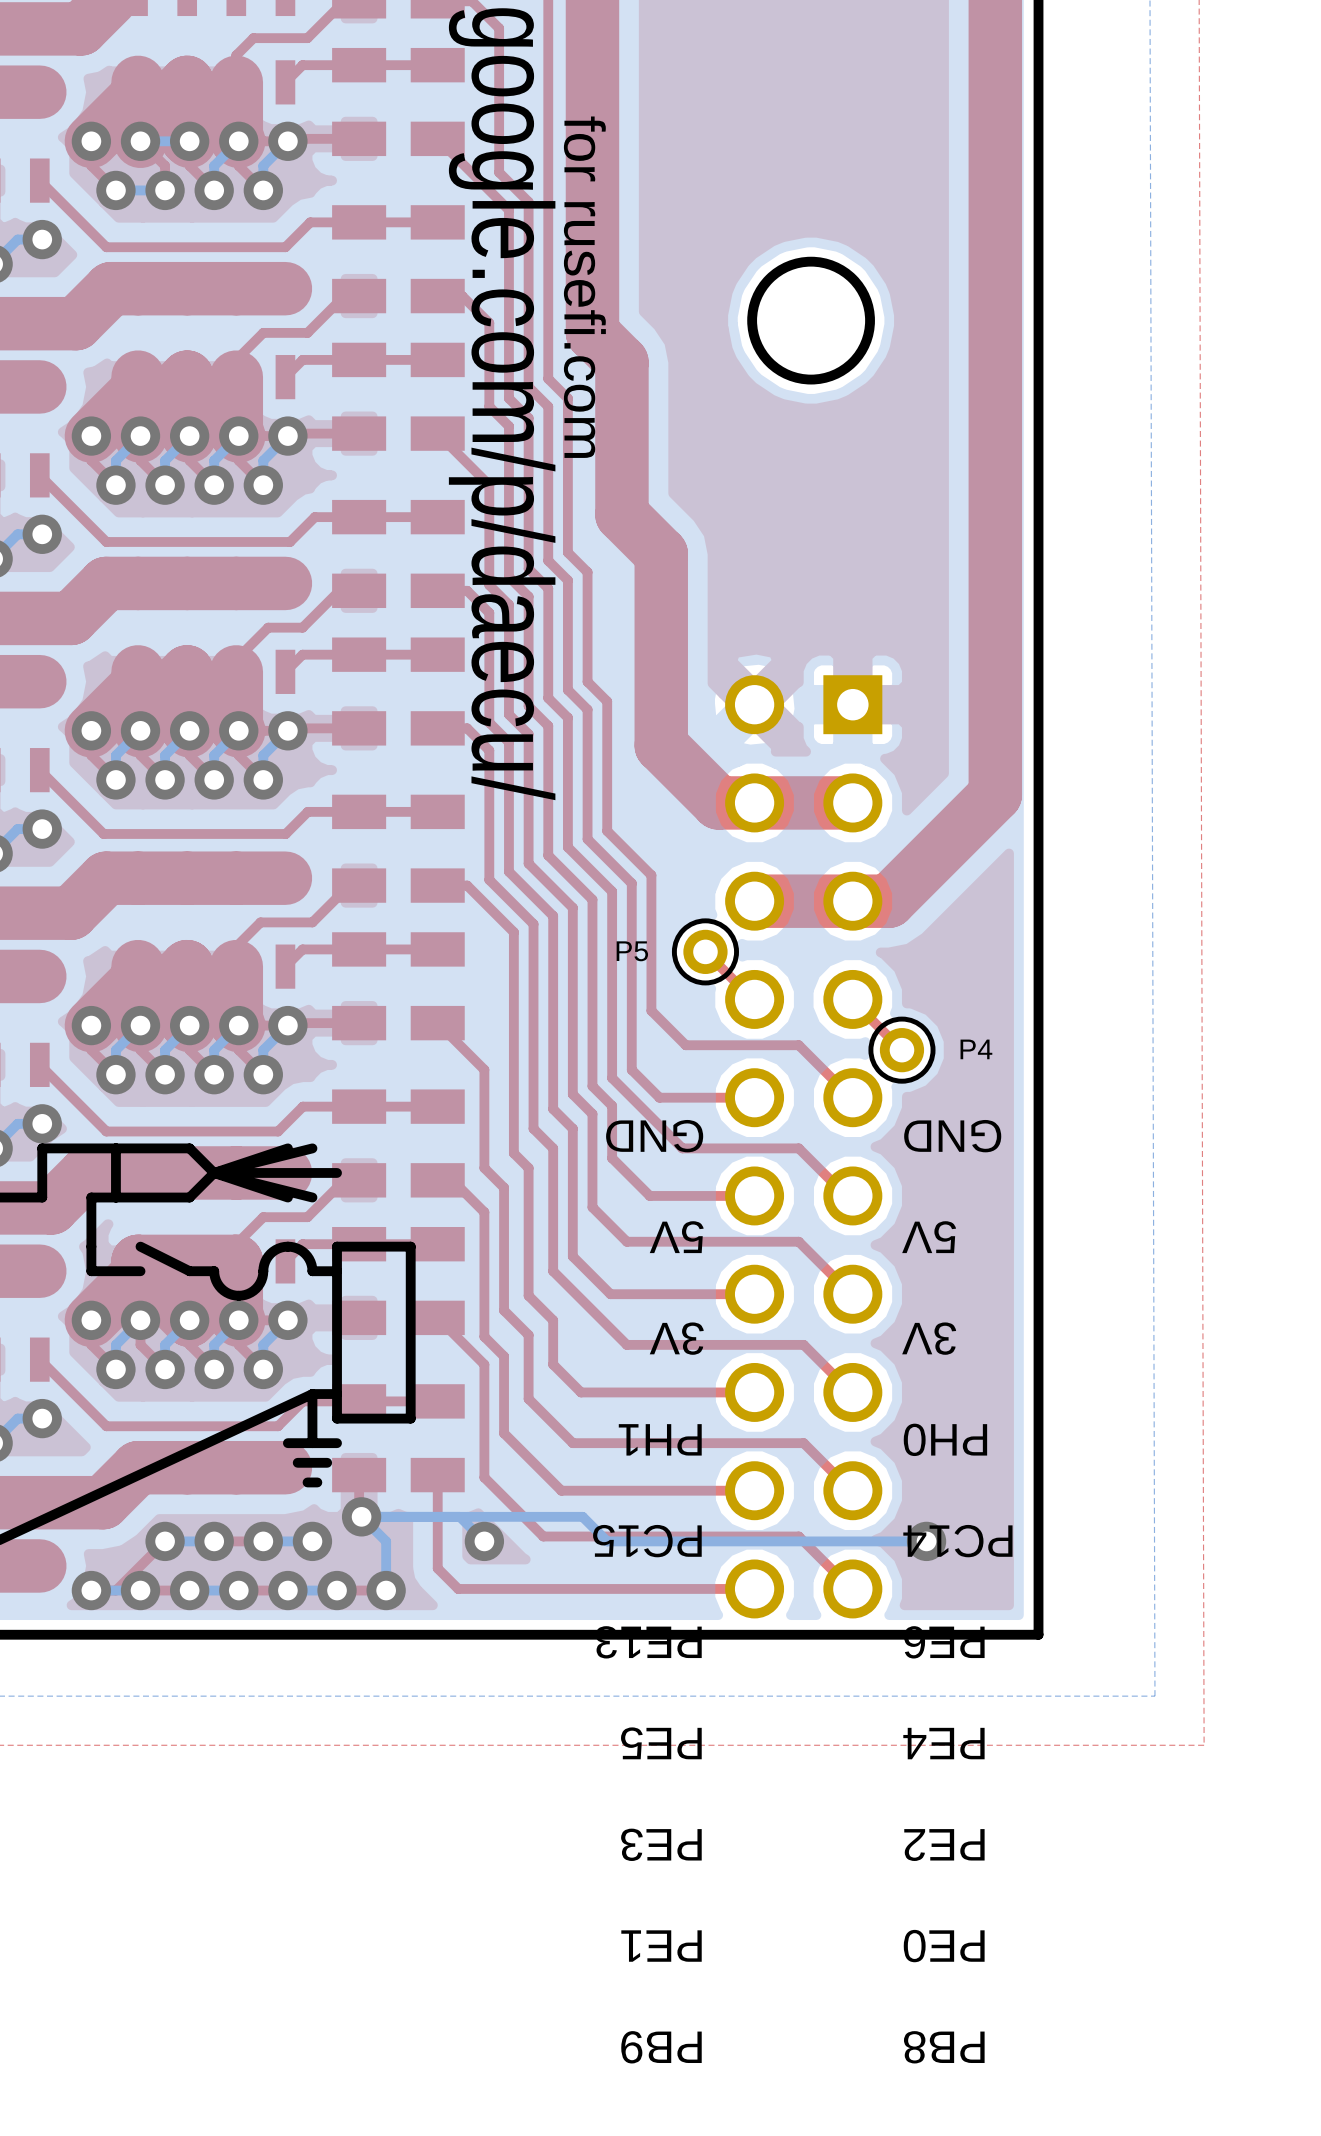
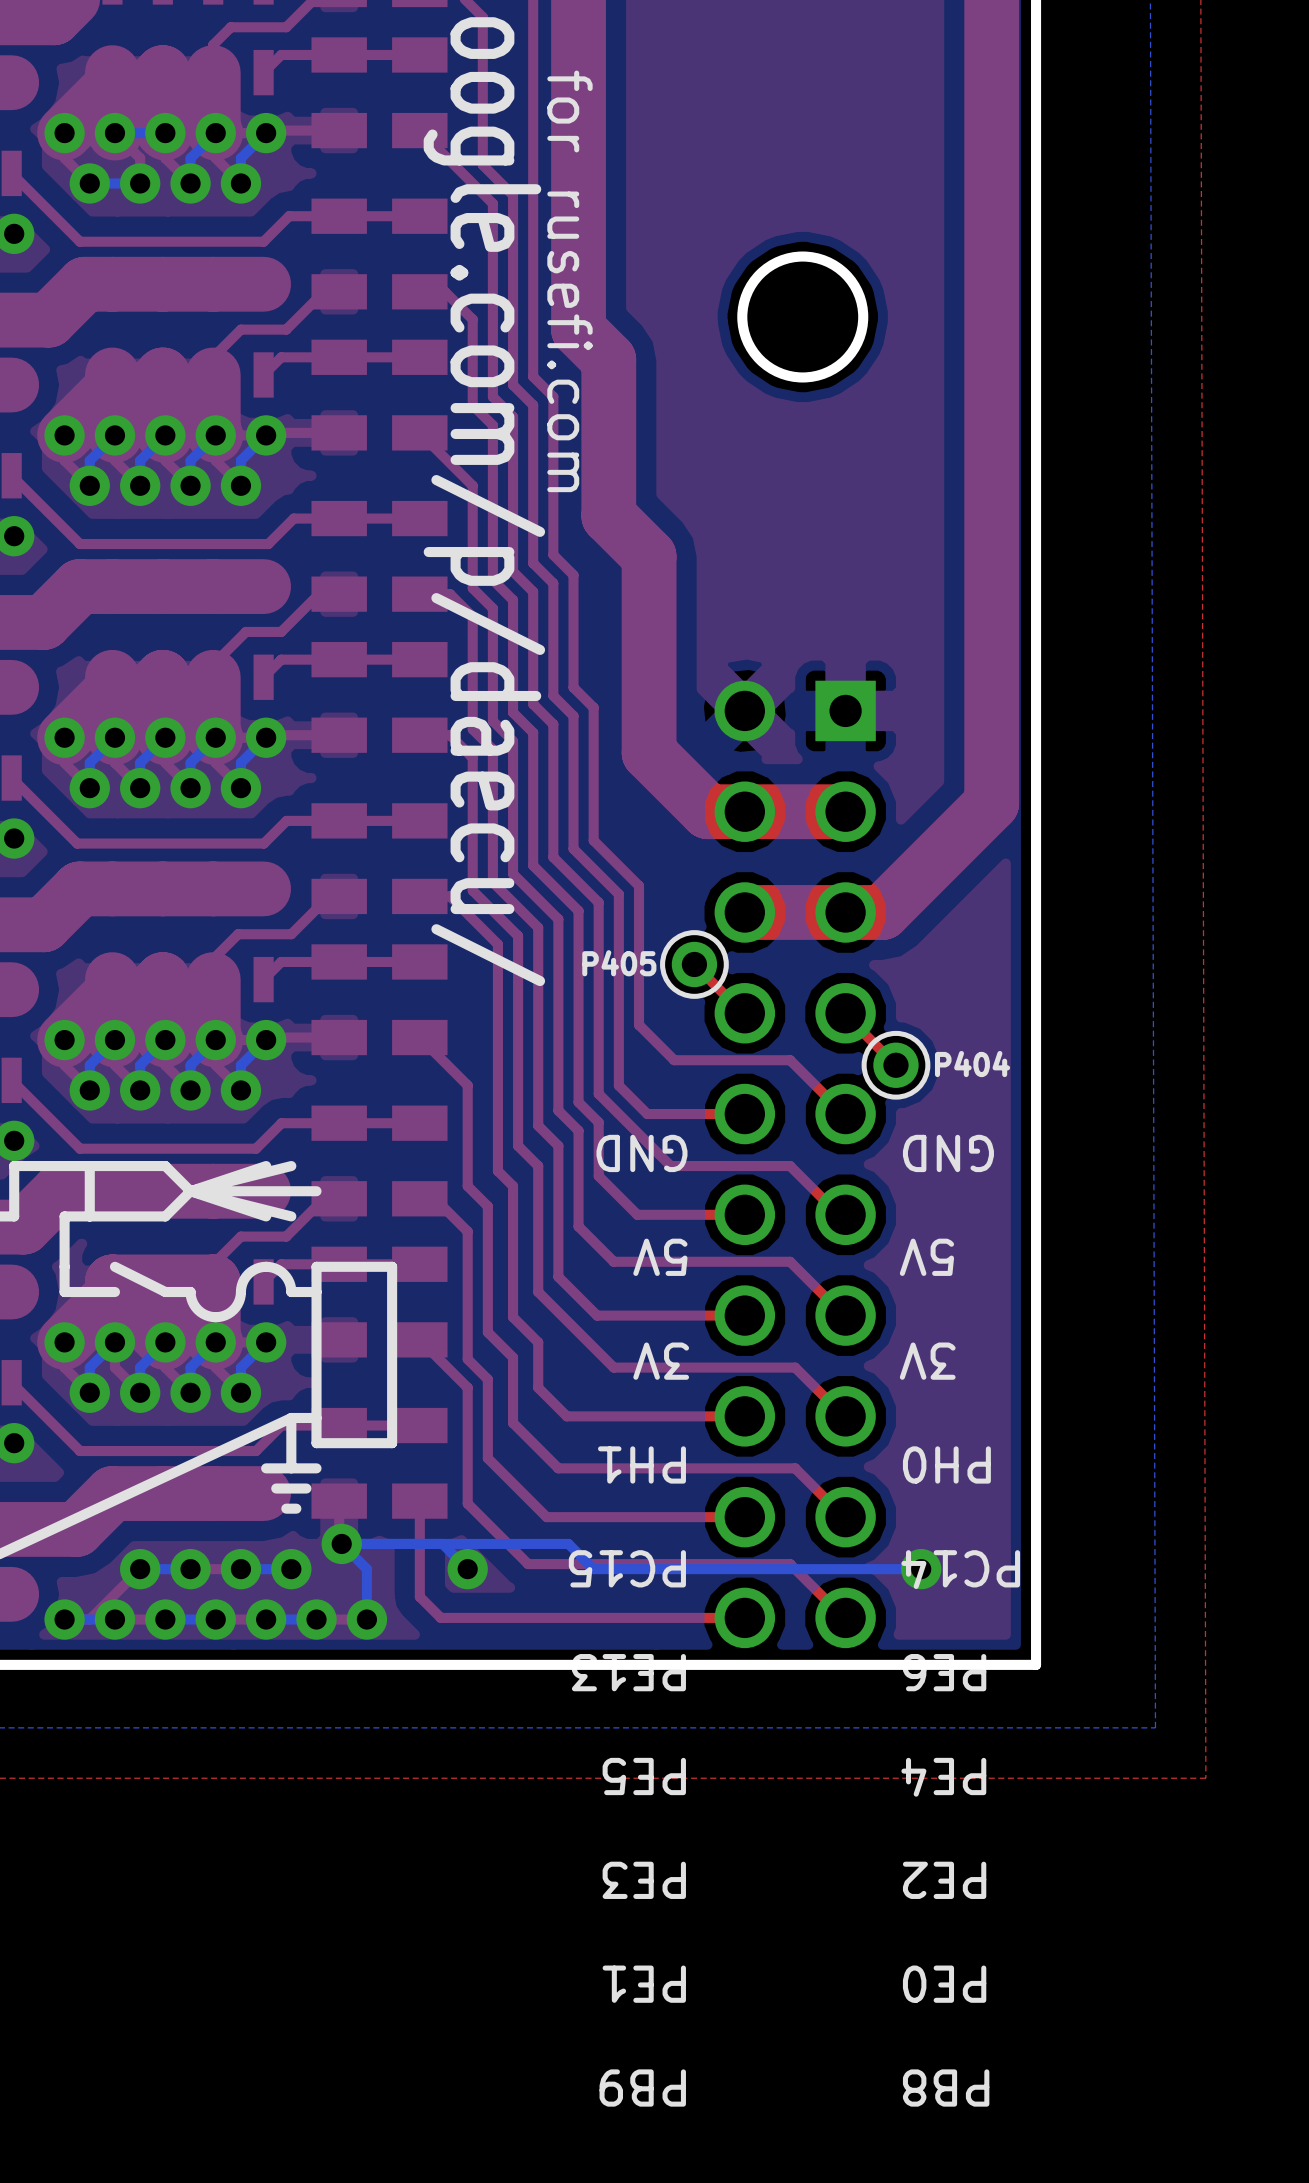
P5 name: P5 (632, 951) -> P405 (619, 963)
P4 name: P4 (976, 1049) -> P404 (972, 1064)

